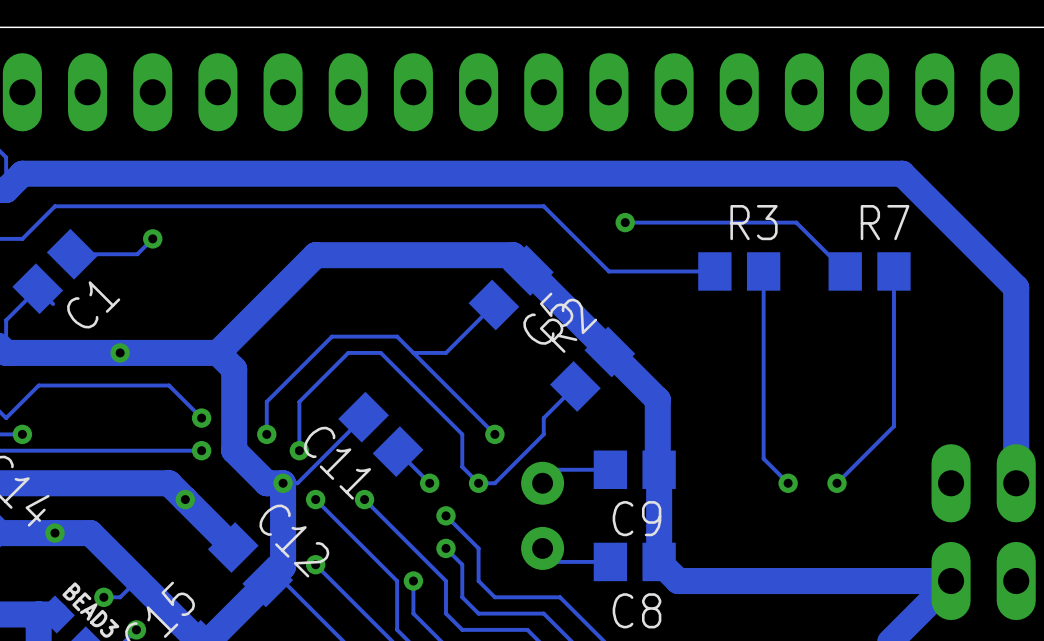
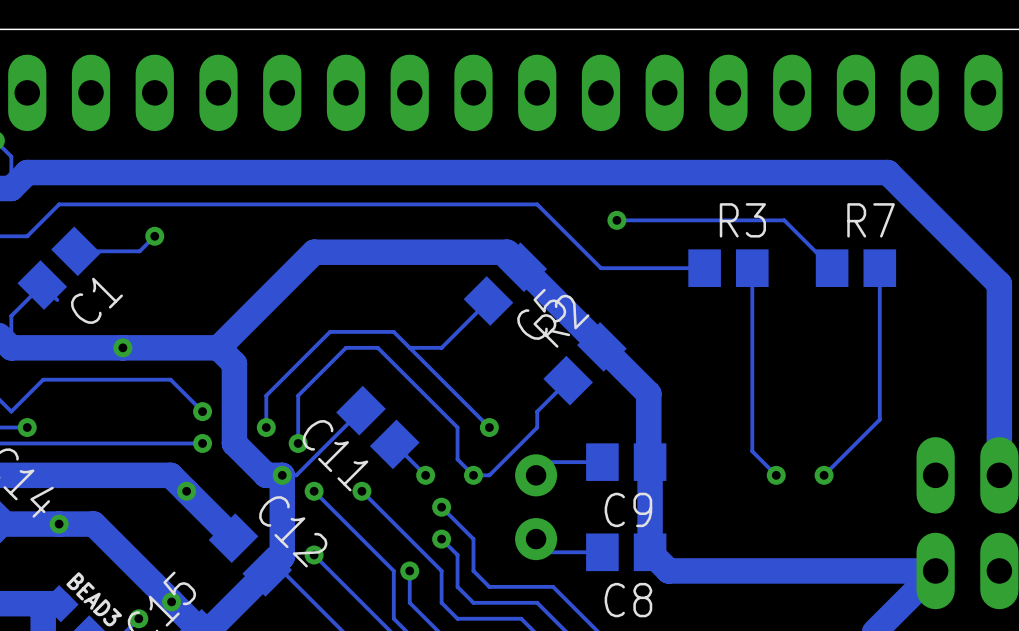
track: (137, 580) (120, 597) (103, 597) -> none
via position: (103, 597) -> (171, 601)

